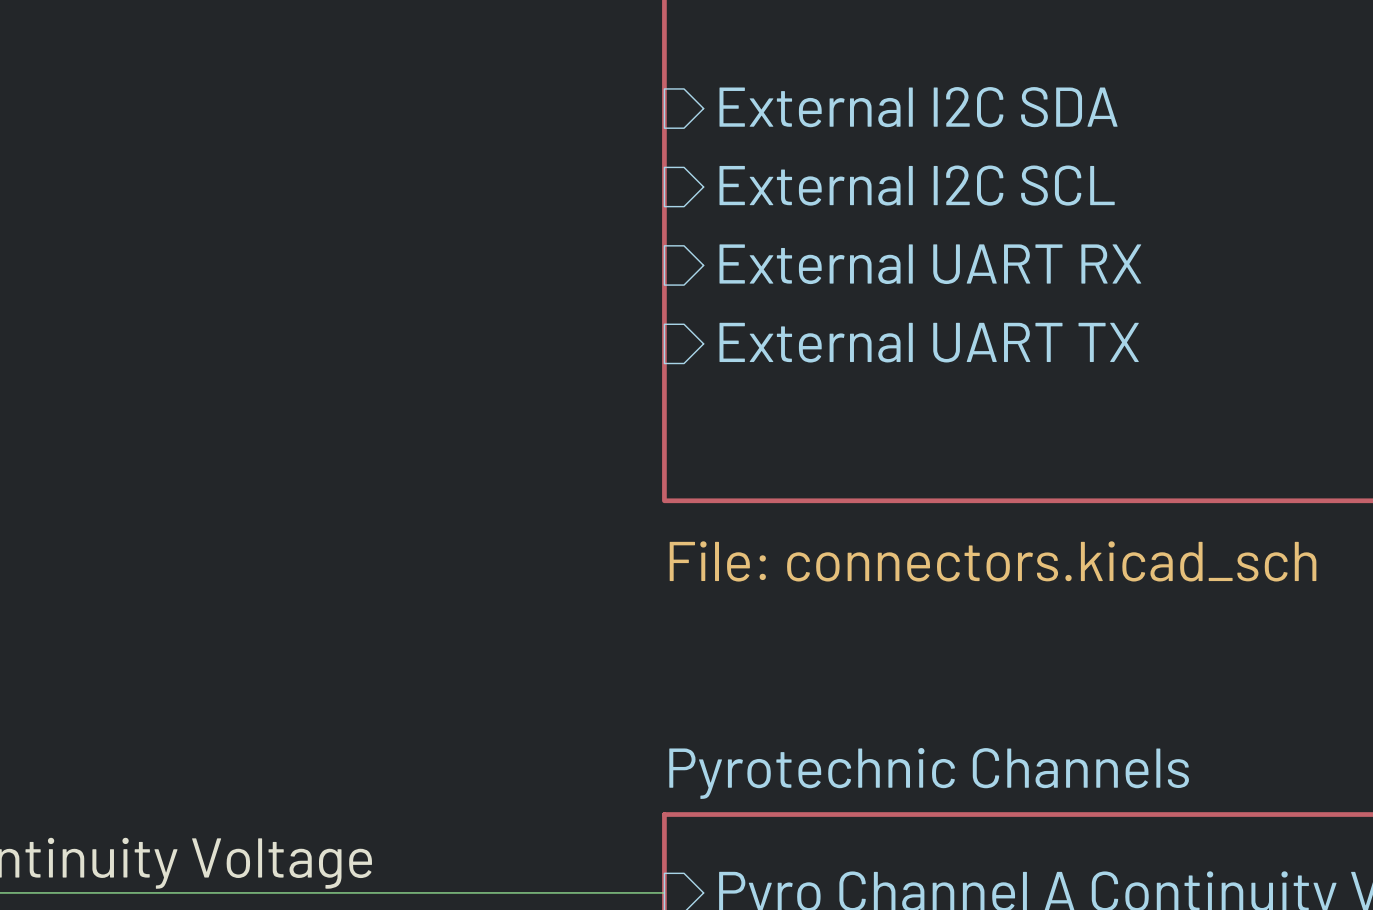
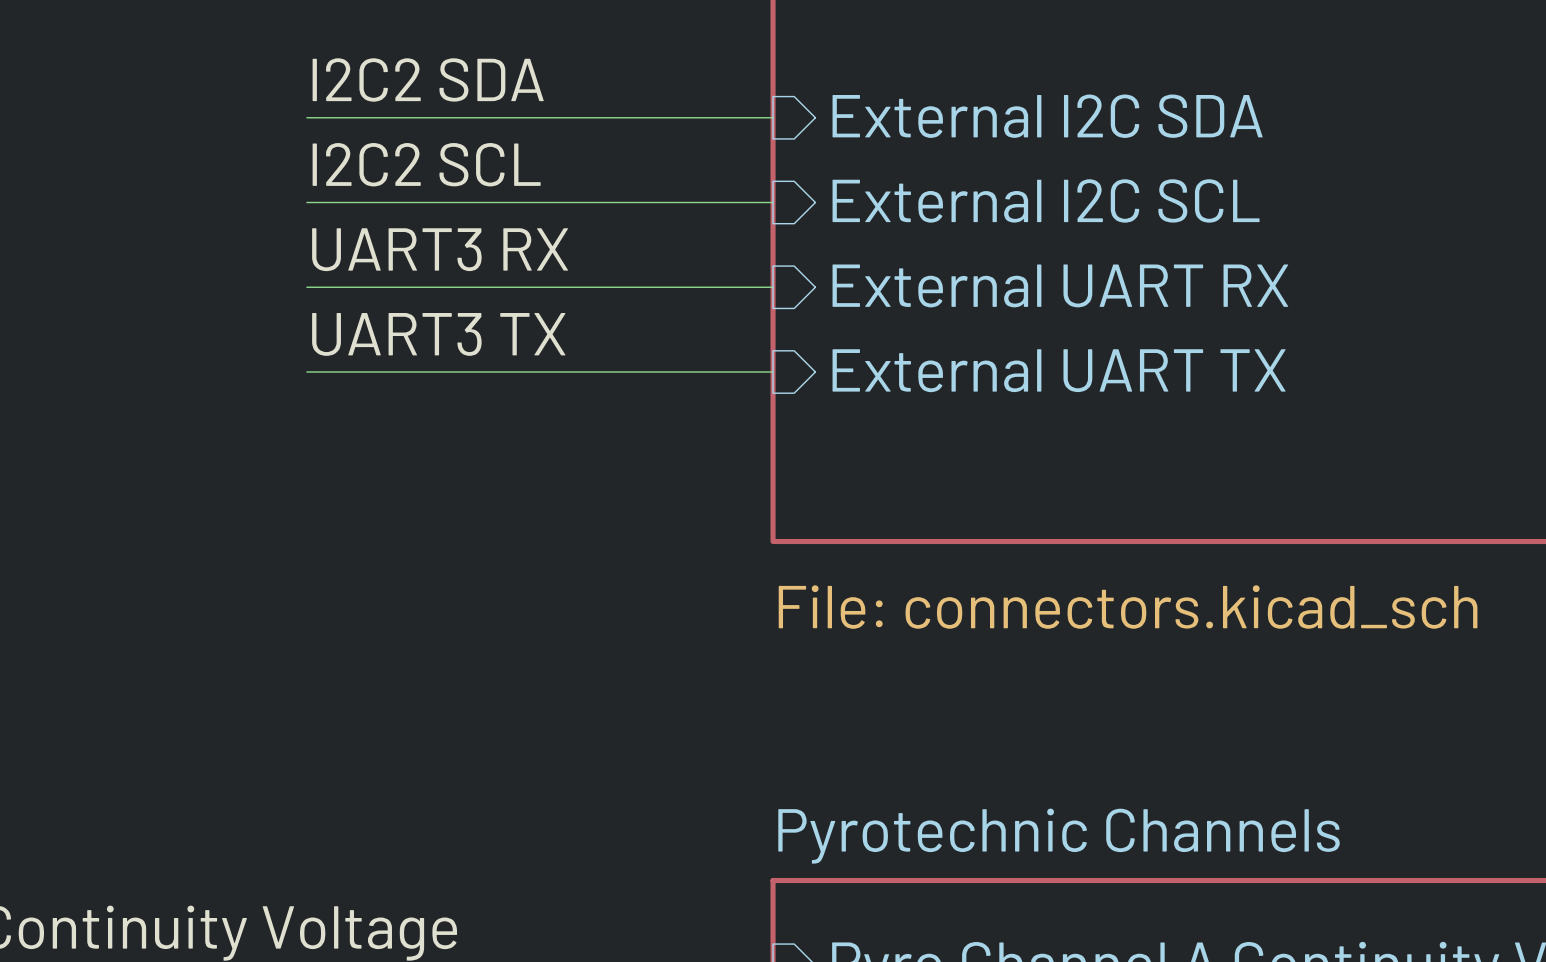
label: none -> I2C2 SDA (428, 79)
wire: none -> (306, 117) (773, 117)
label: none -> I2C2 SCL (426, 164)
wire: none -> (306, 202) (773, 202)
label: none -> UART3 RX (440, 249)
wire: none -> (306, 287) (773, 287)
label: none -> UART3 TX (438, 334)
wire: none -> (306, 372) (773, 372)

